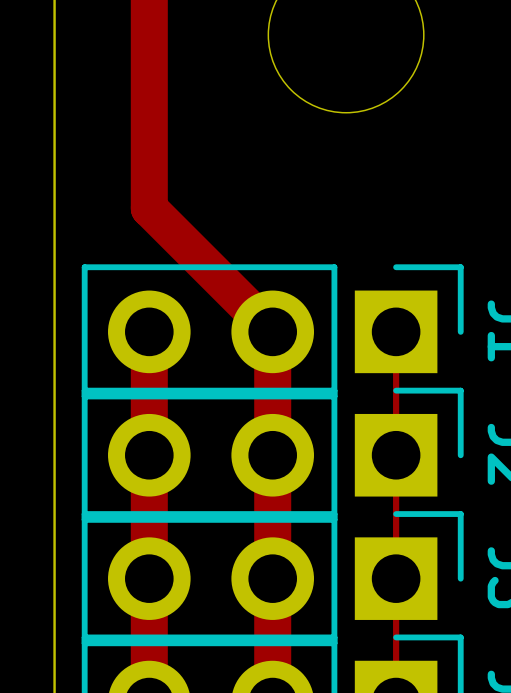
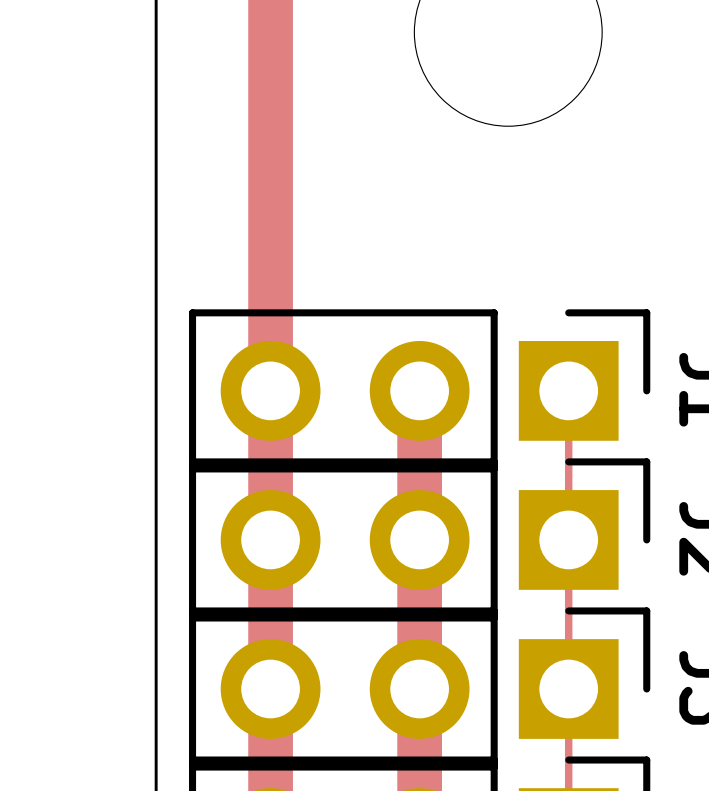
track: (149, 208) (272, 331) -> (270, 241) (270, 390)

